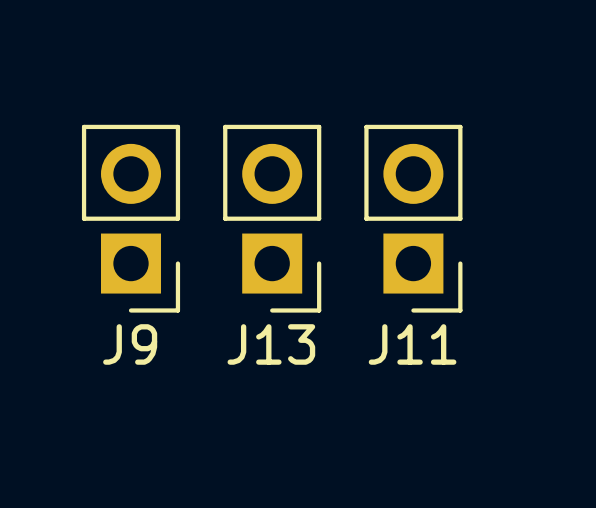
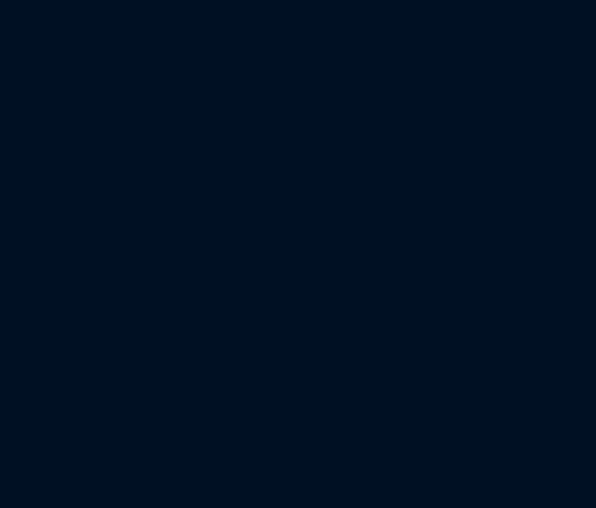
J9: (131, 218) -> none
J13: (272, 218) -> none
J11: (413, 218) -> none

